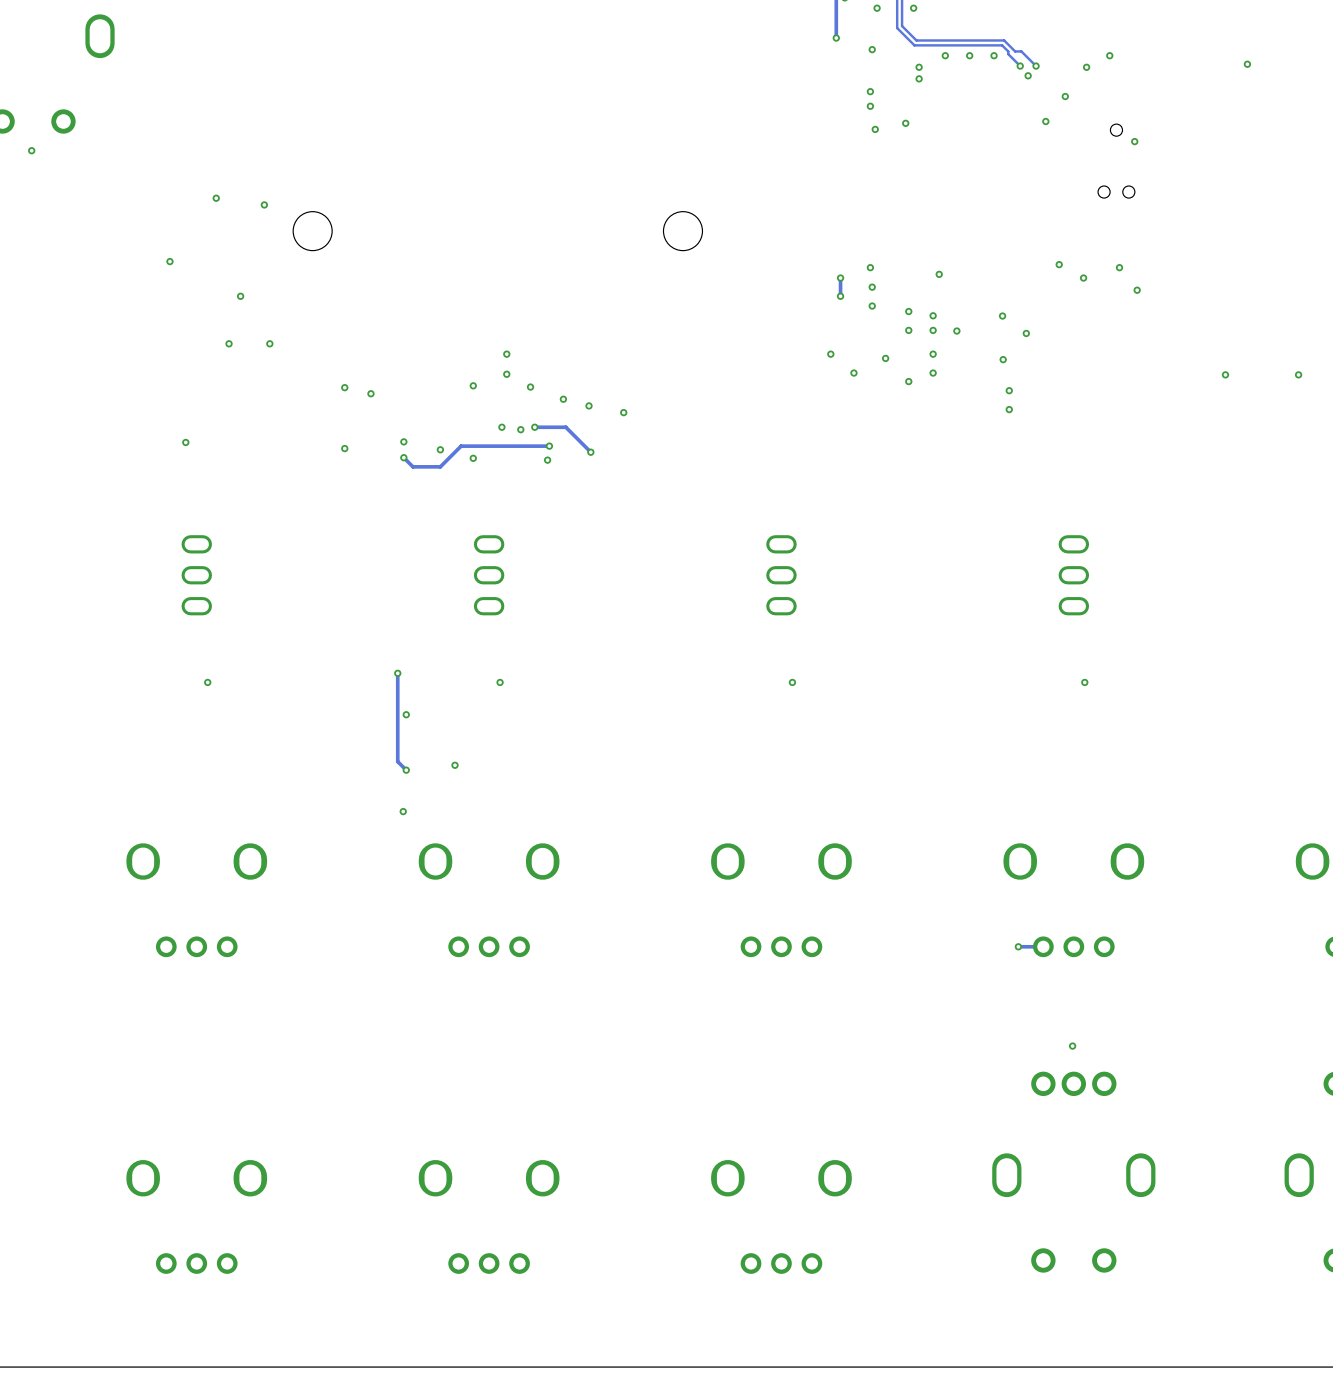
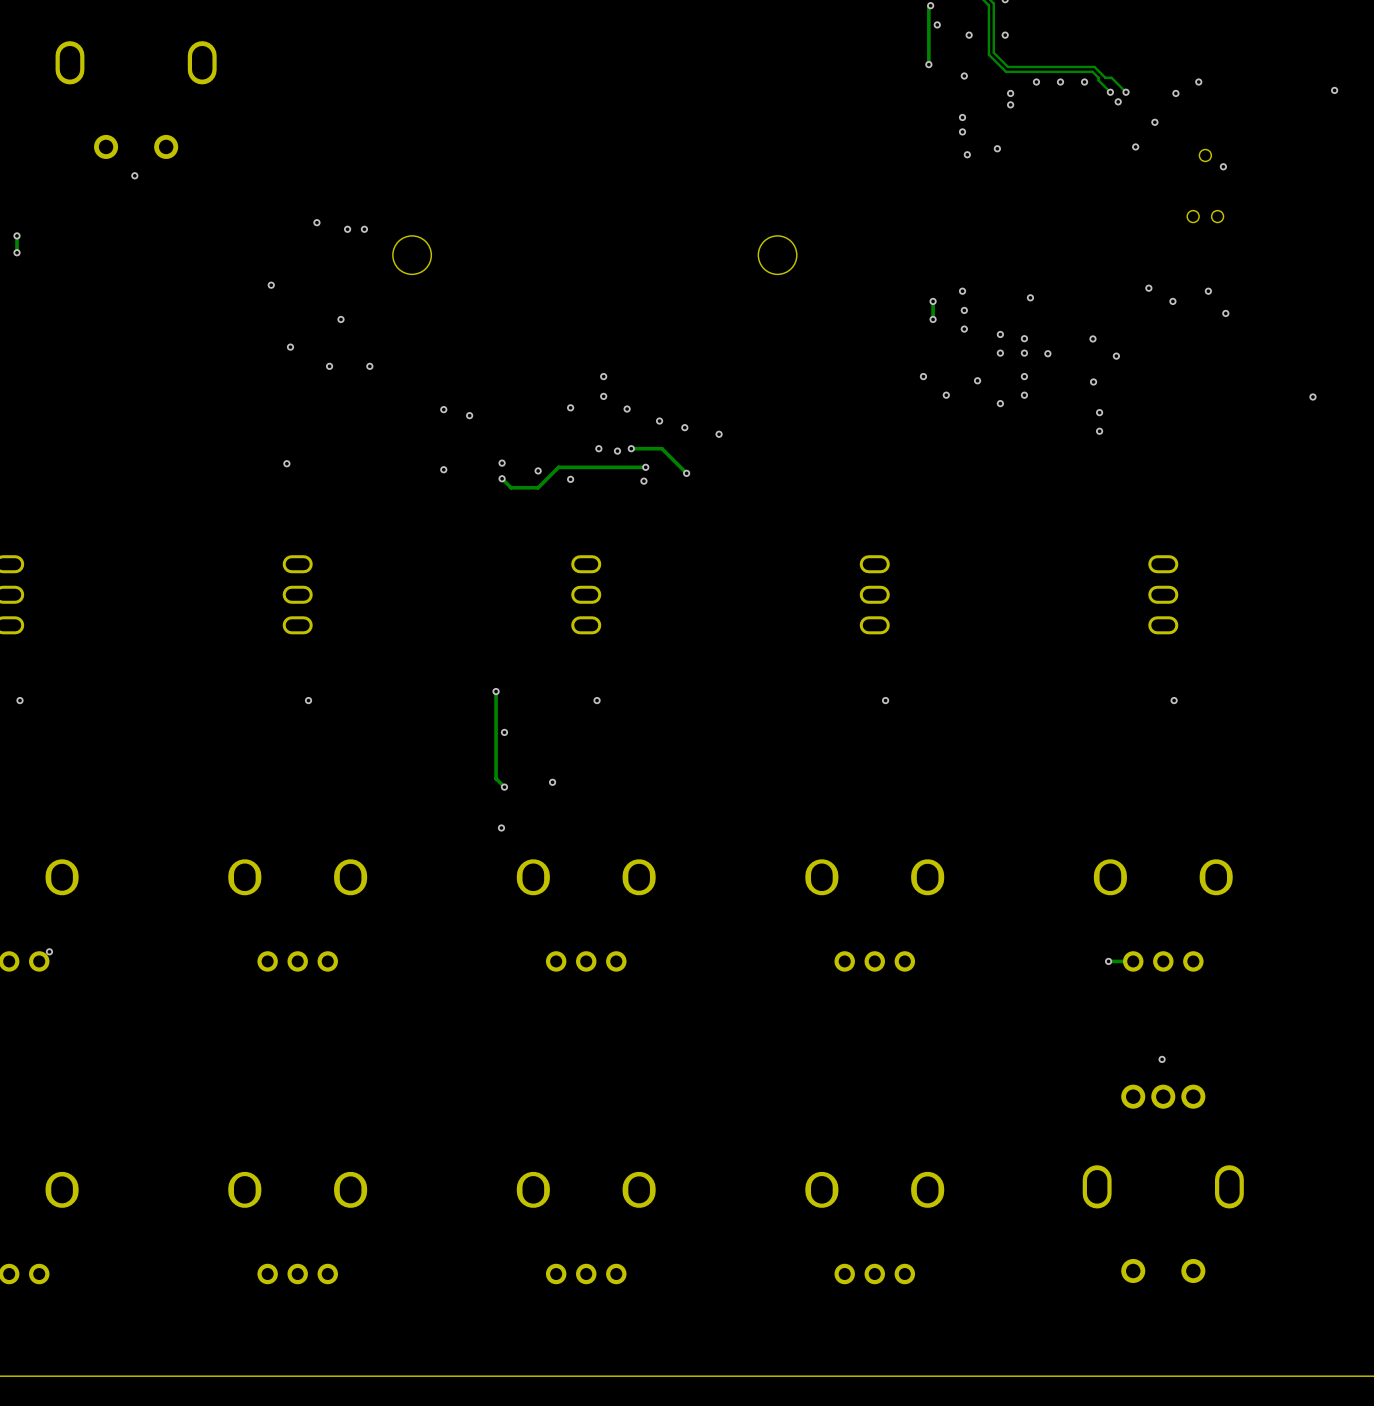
via: none -> (347, 229)
via: none -> (290, 347)

